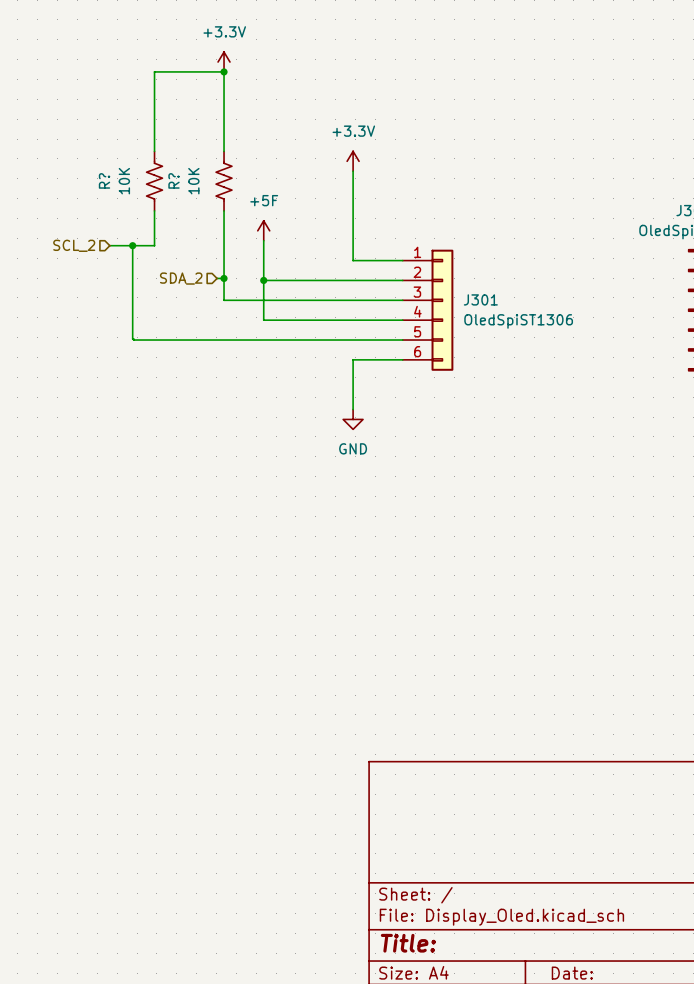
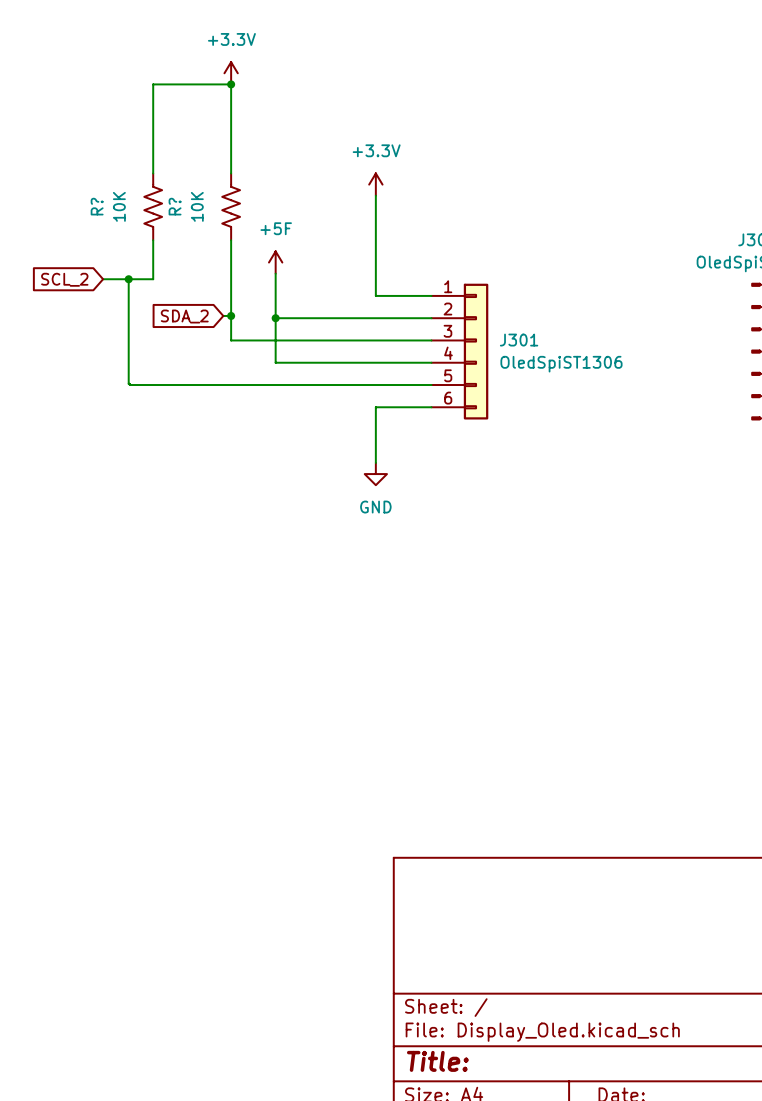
hierarchical label: SCL_2 (74, 245) -> none
global label: none -> SCL_2 (64, 279)
hierarchical label: SDA_2 (181, 278) -> none
global label: none -> SDA_2 (184, 316)

